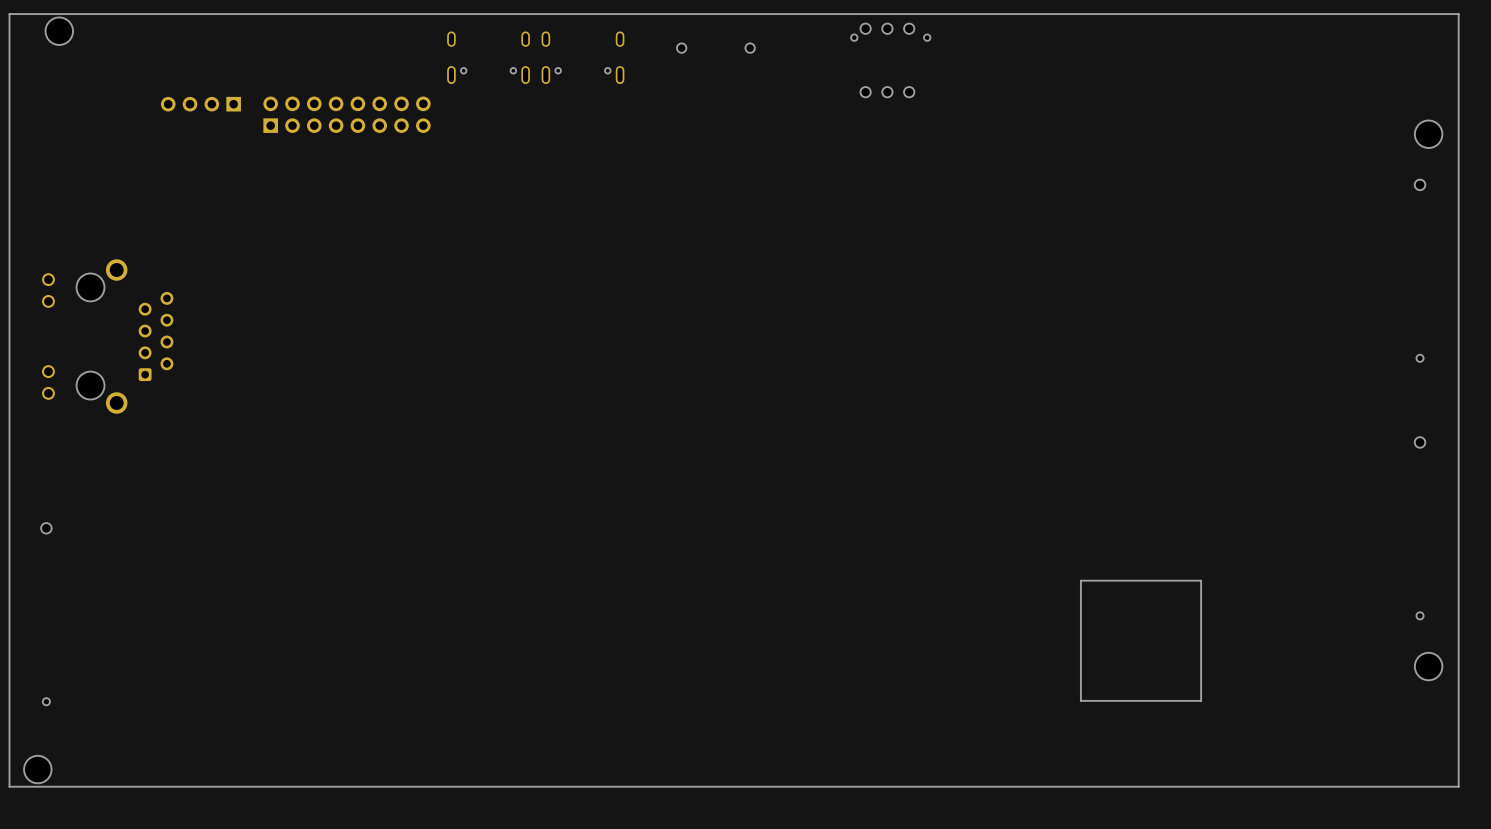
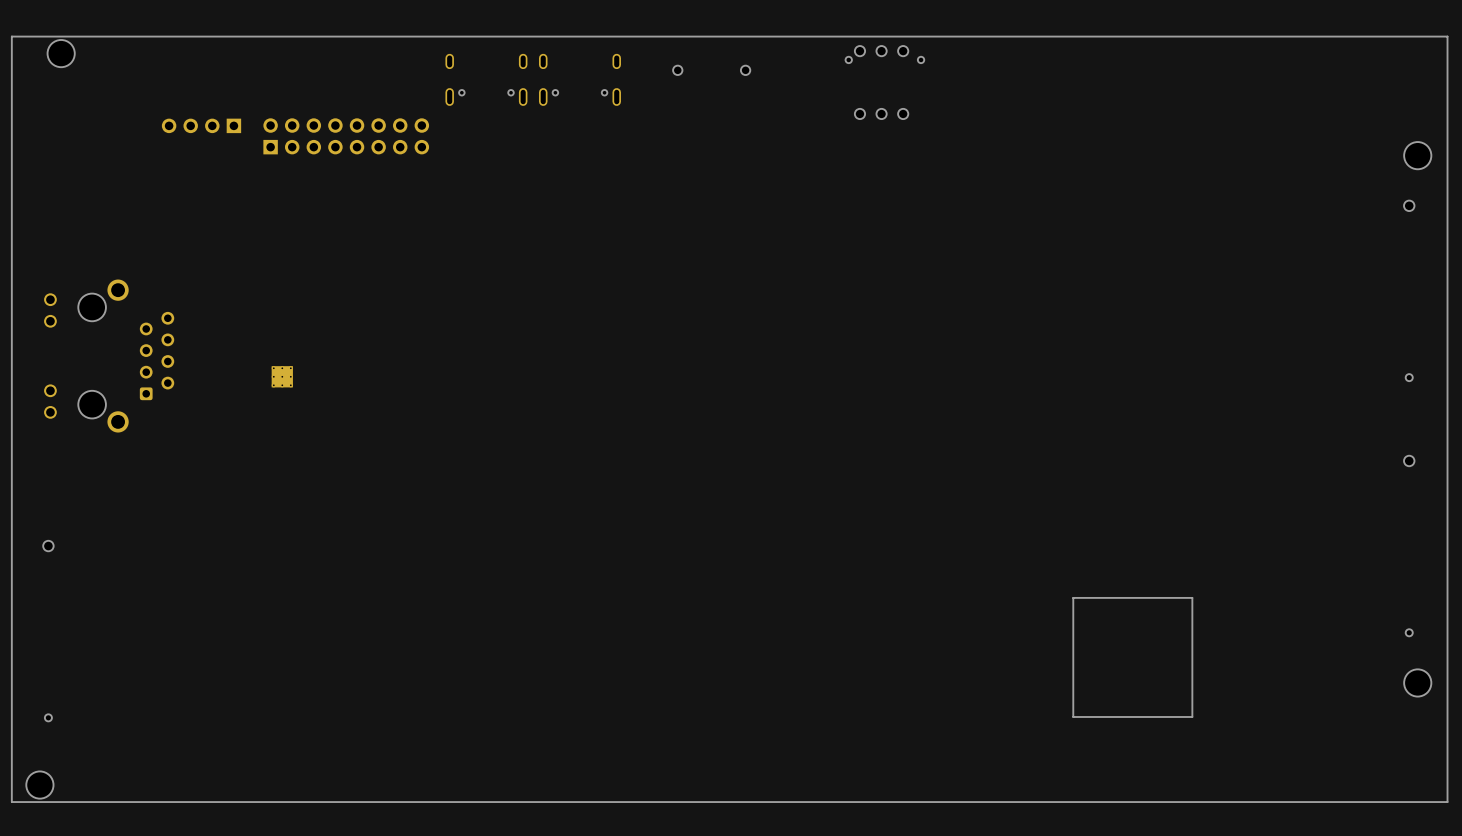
part: none -> (282, 376)

